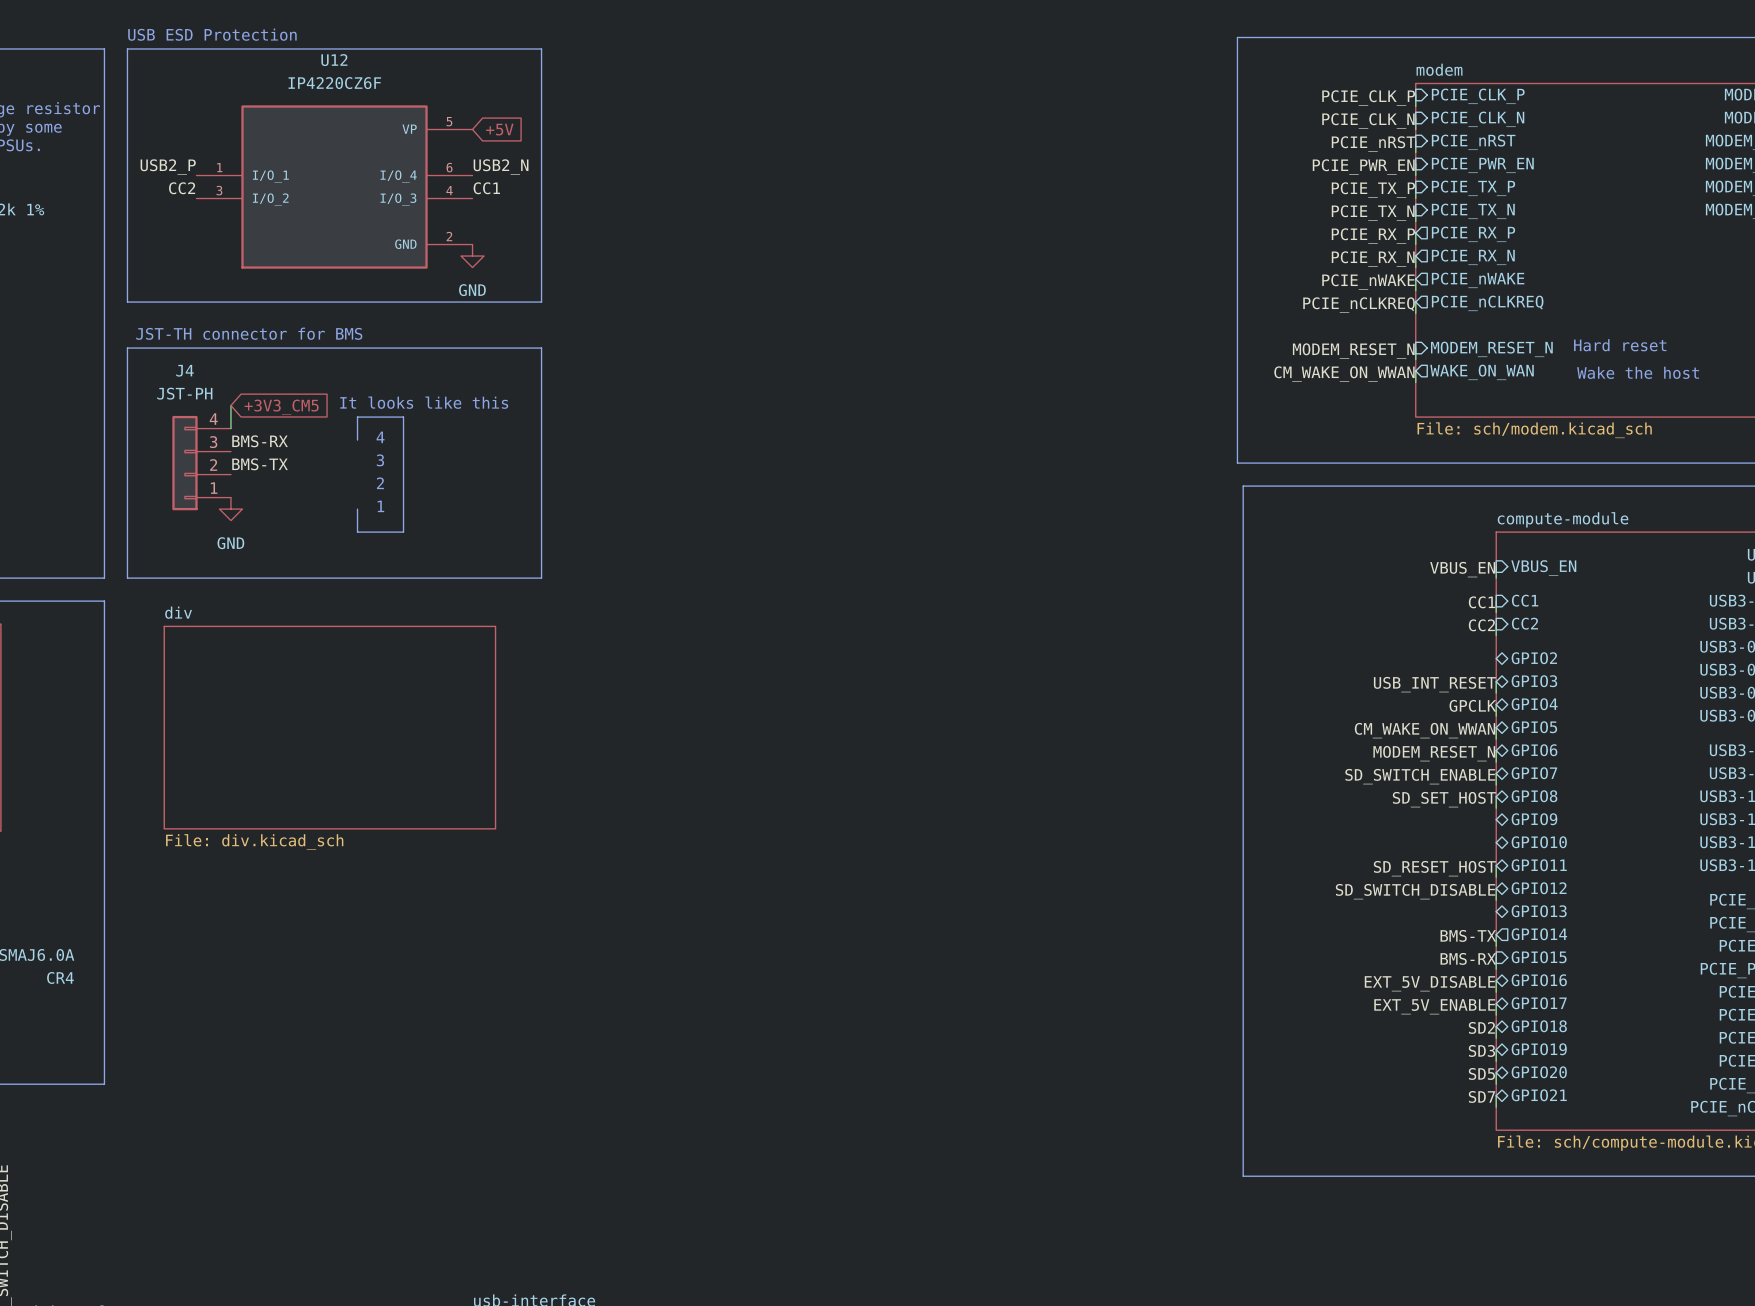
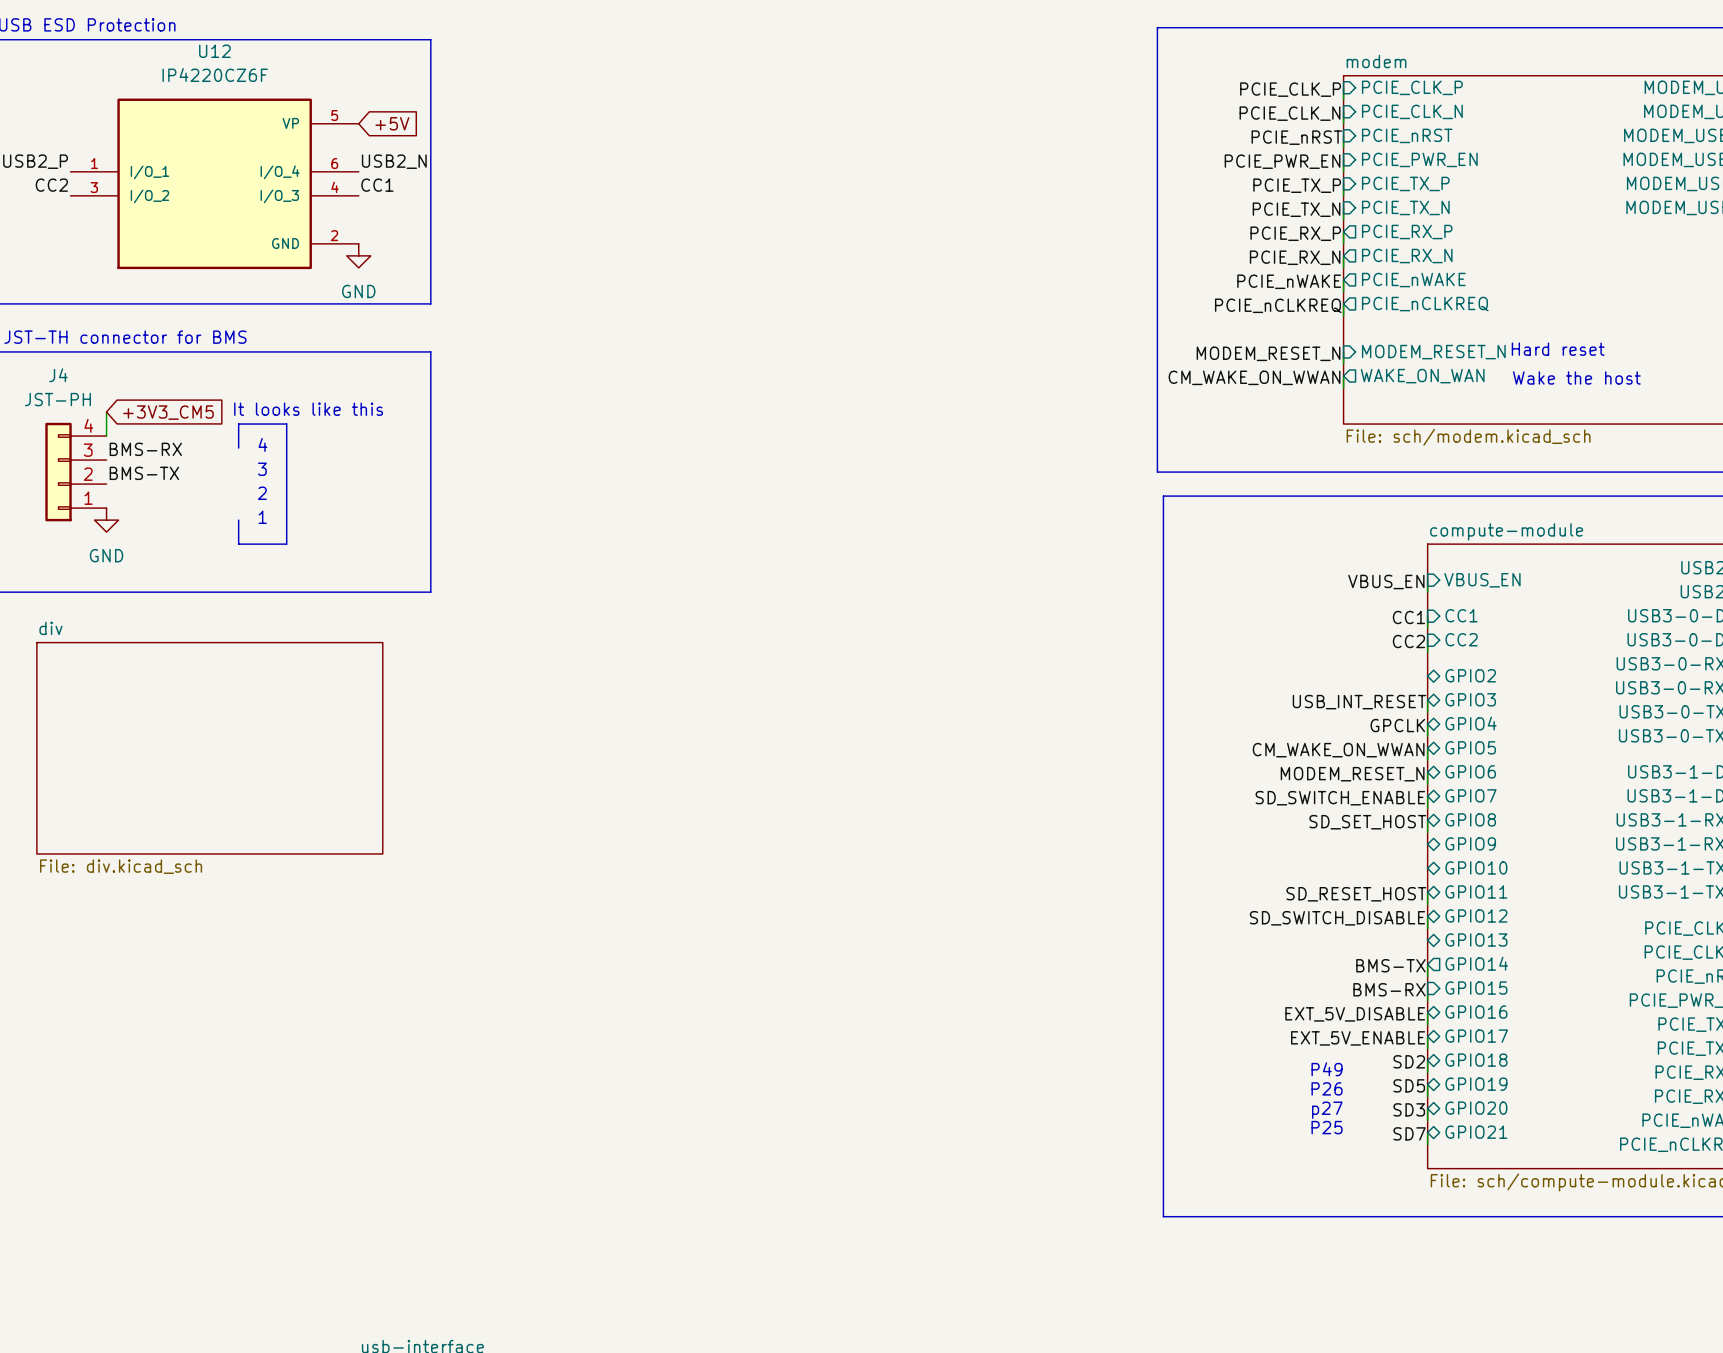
text: none -> P49 (1327, 1069)
label: SD3 (1481, 1050) -> SD5 (1409, 1085)
text: none -> P26 (1327, 1088)
text: none -> p27 (1327, 1110)
label: SD5 (1481, 1073) -> SD3 (1409, 1109)
text: none -> P25 (1327, 1127)

